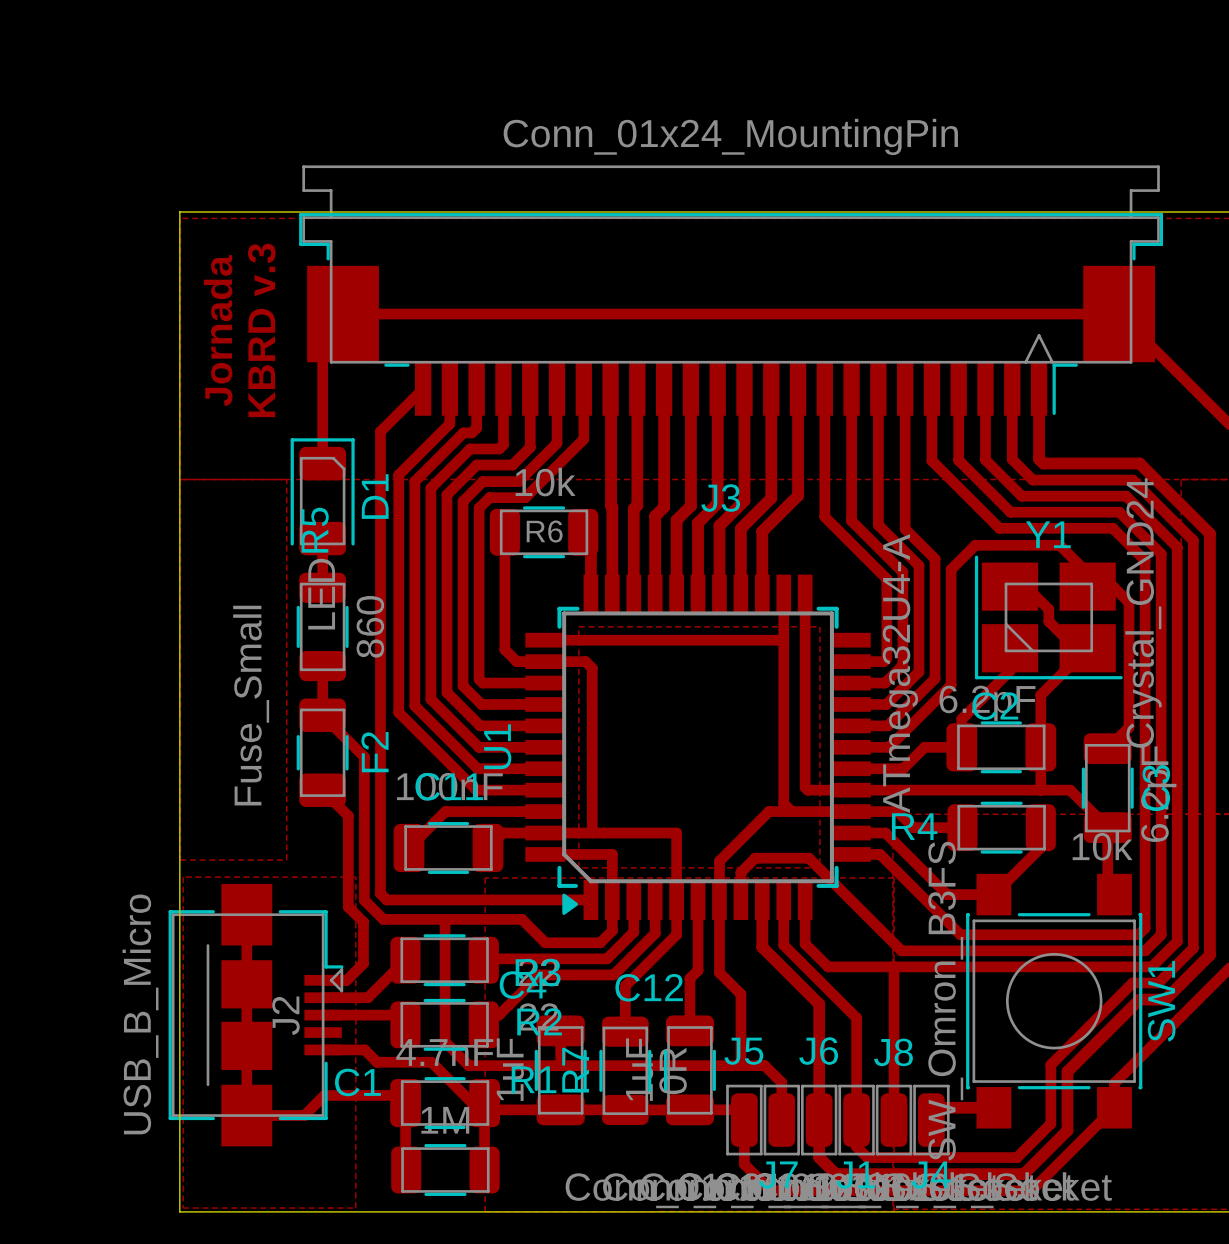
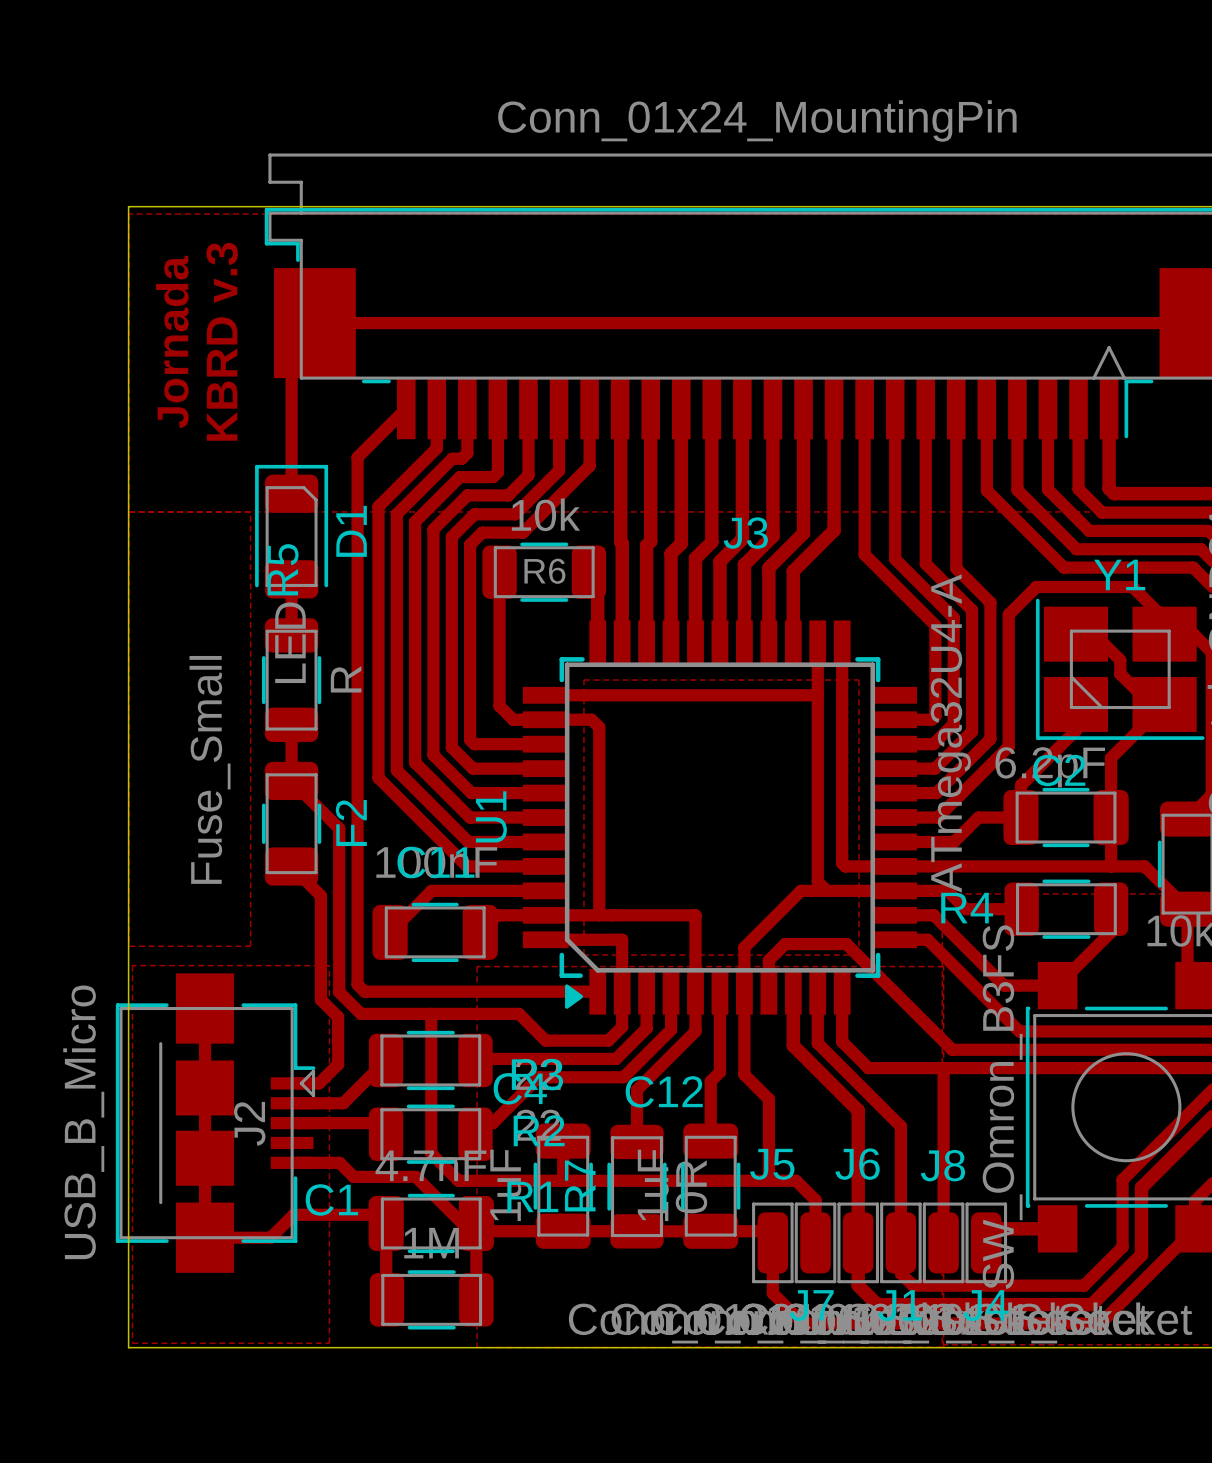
R5 value: 860 (370, 626) -> R (346, 679)

